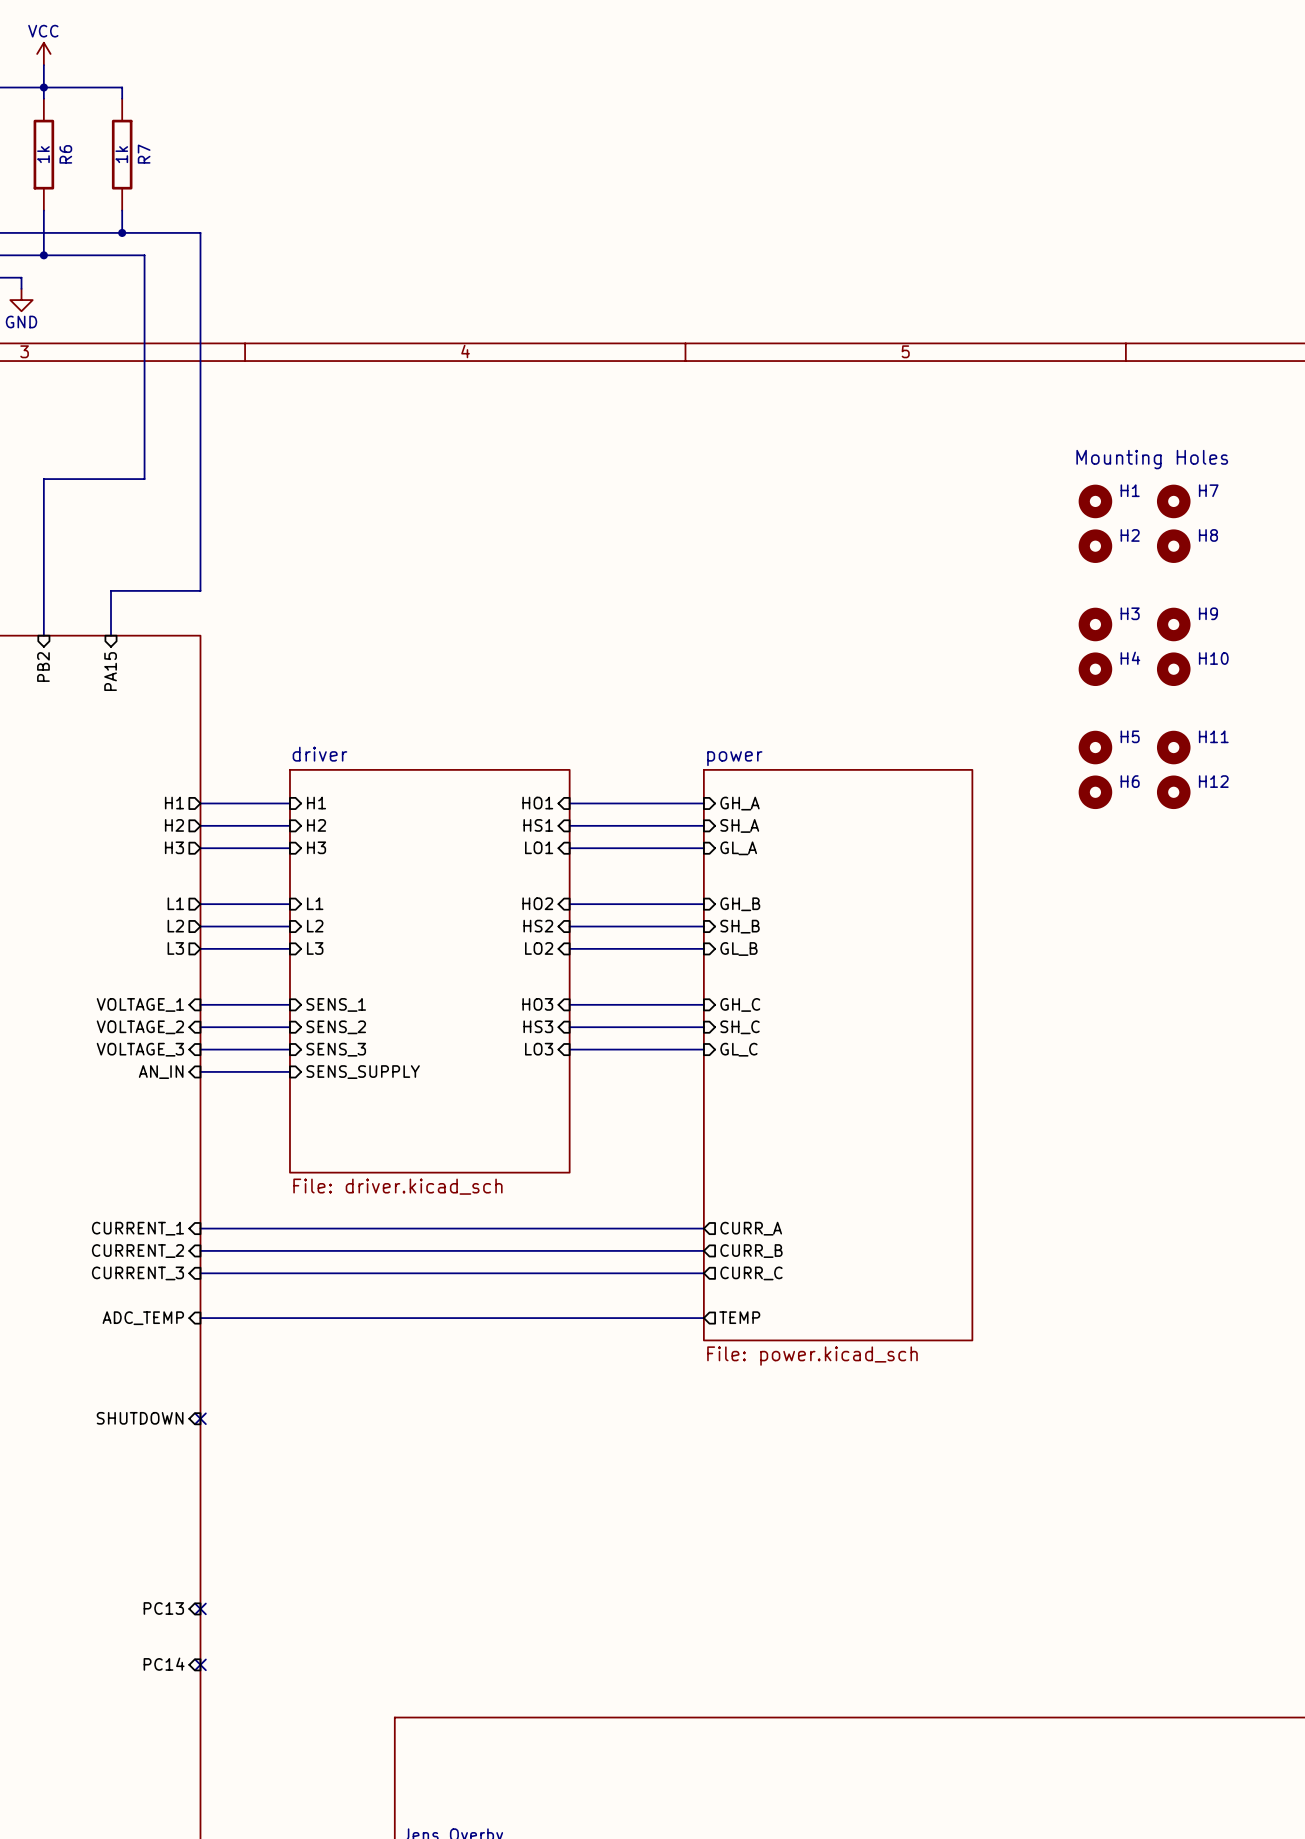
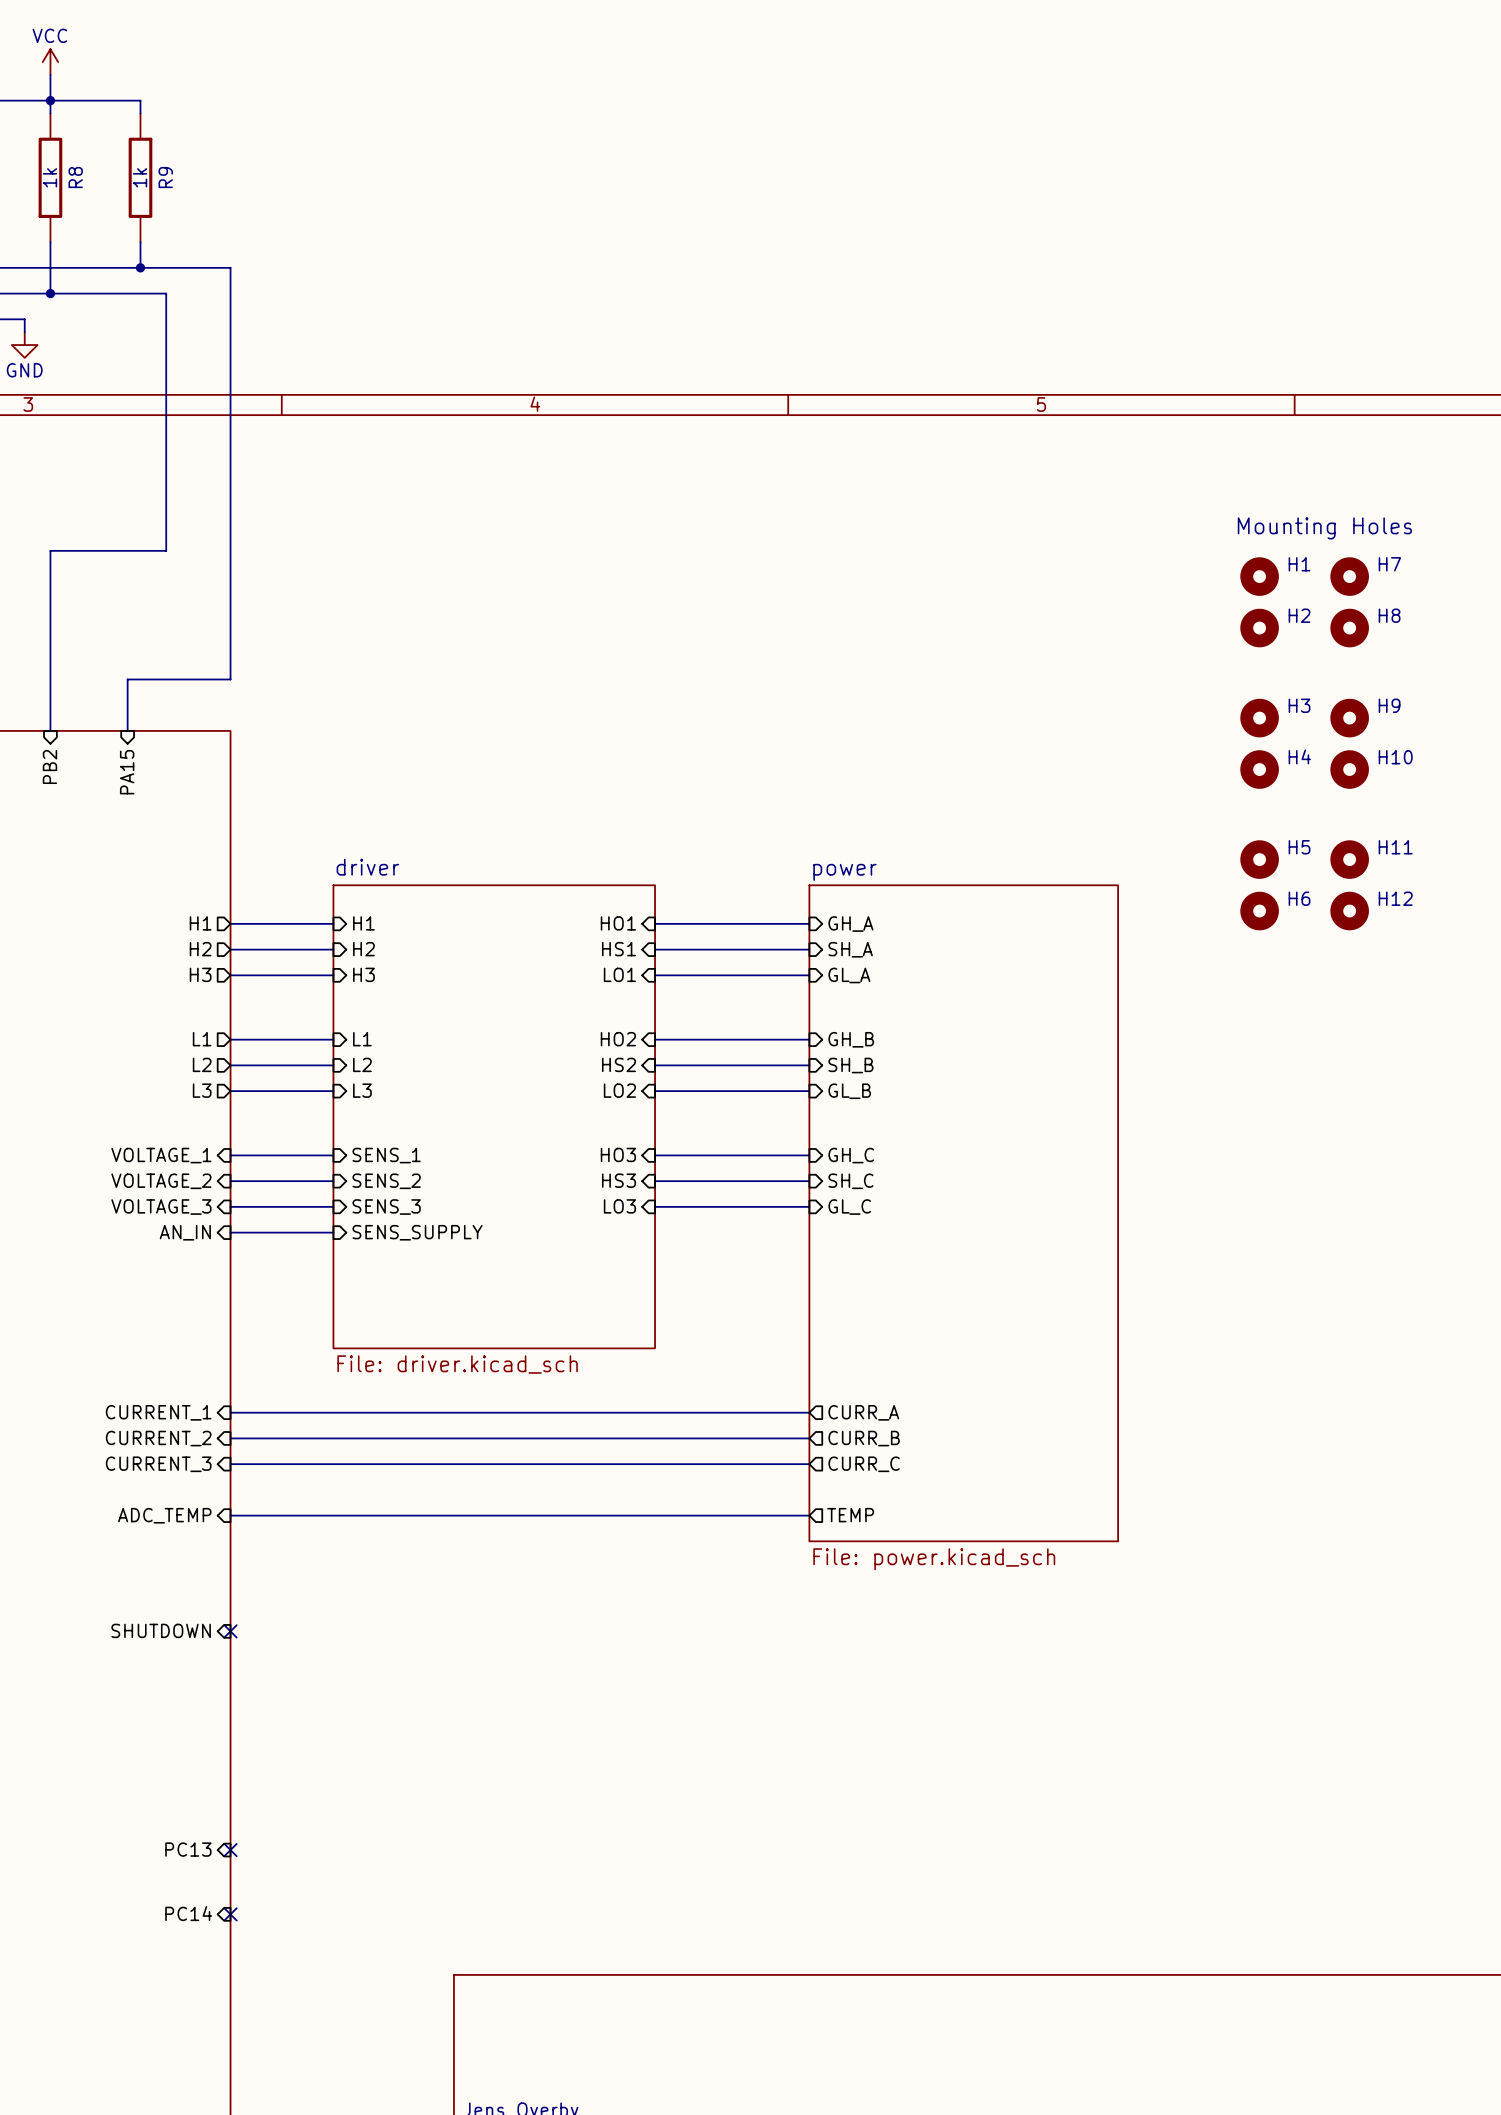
R6 name: R6 (65, 154) -> R8 (75, 177)
R7 name: R7 (144, 154) -> R9 (165, 177)

